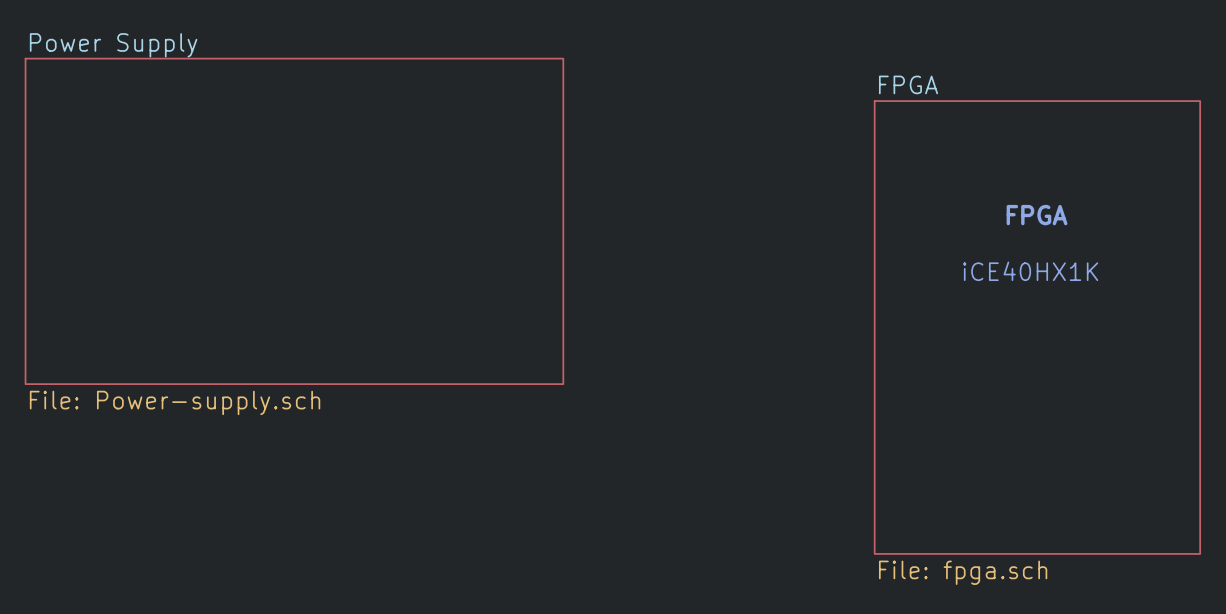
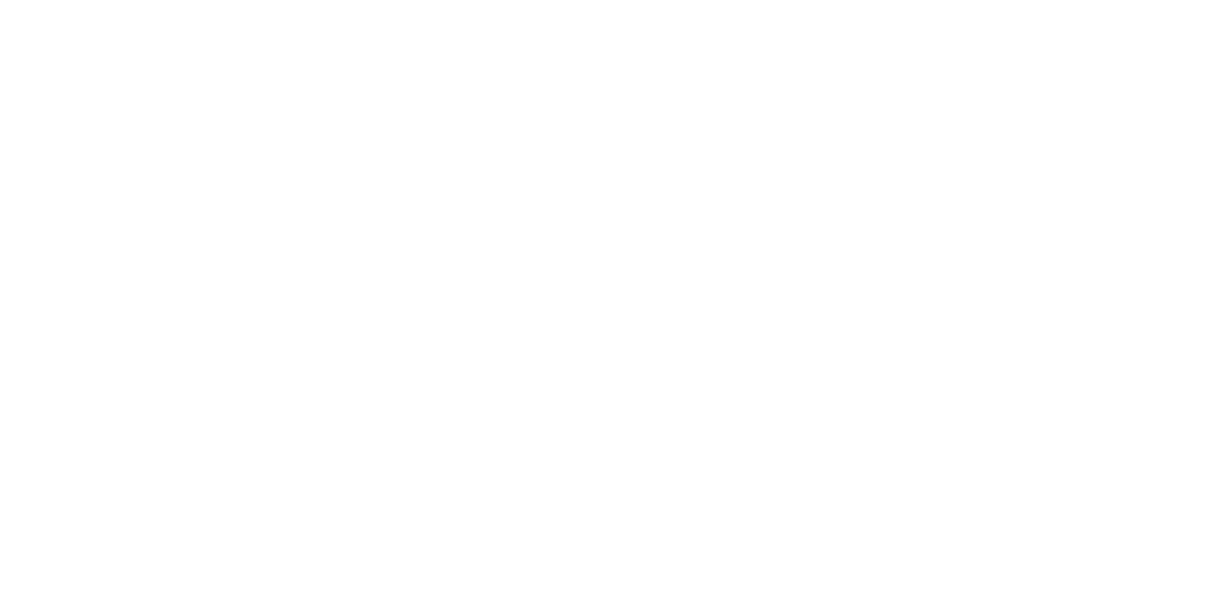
text: FPGA (1037, 215) -> none
sheet Power Supply: File: Power-supply.sch (294, 221) -> none
text: iCE40HX1K (1030, 271) -> none
sheet FPGA: File: fpga.sch (1037, 327) -> none

